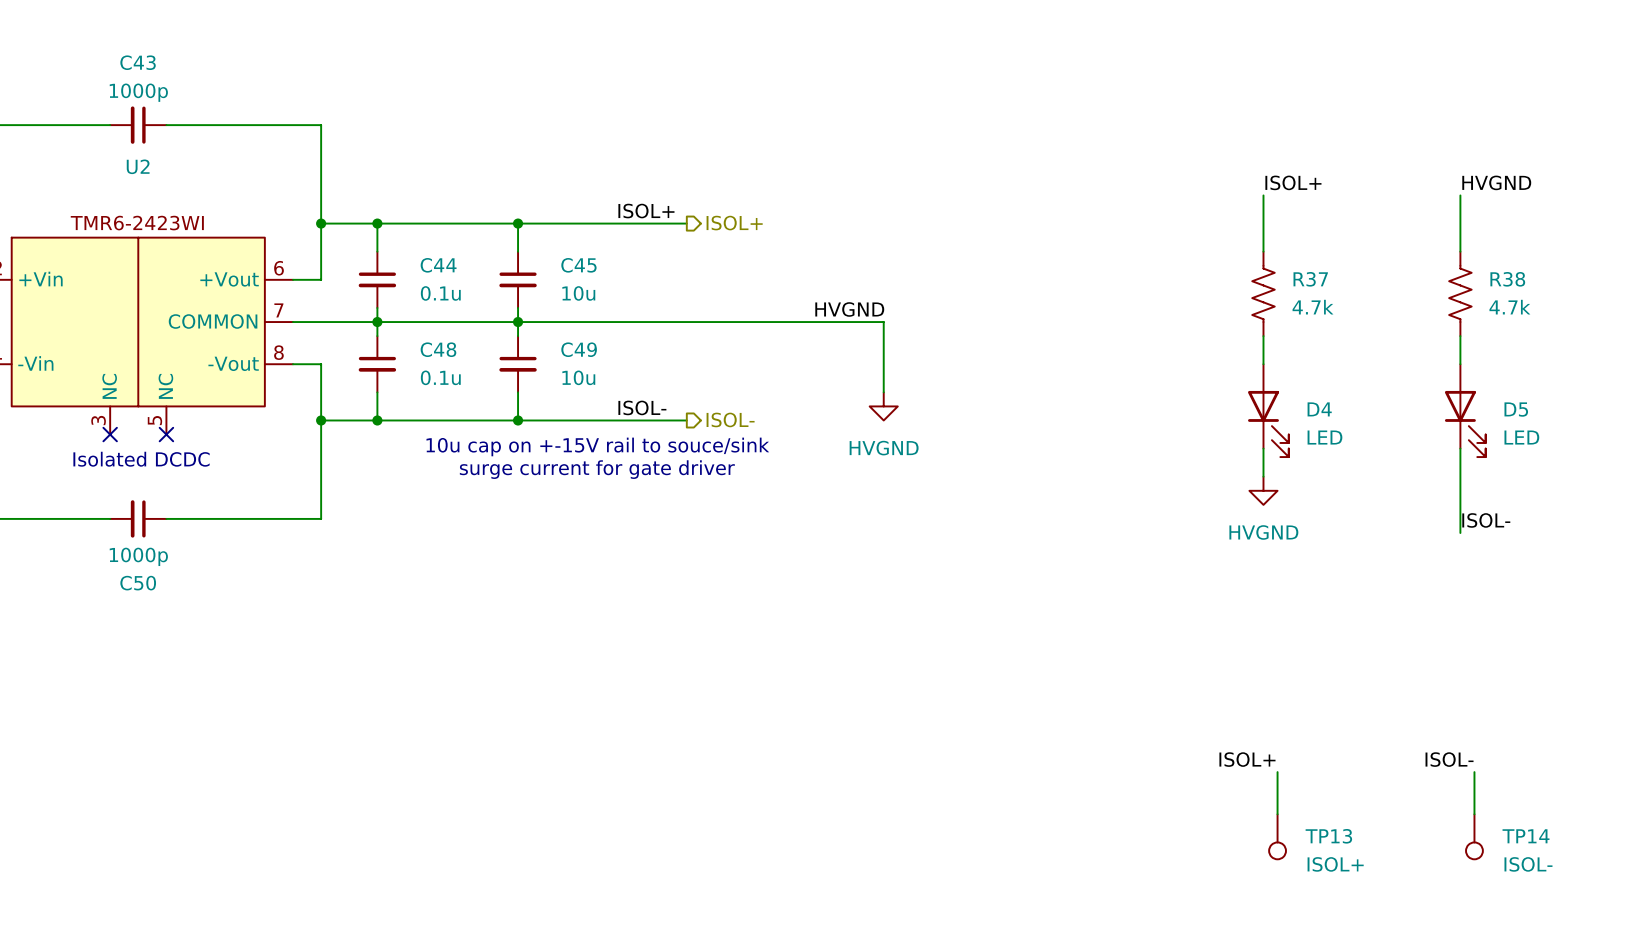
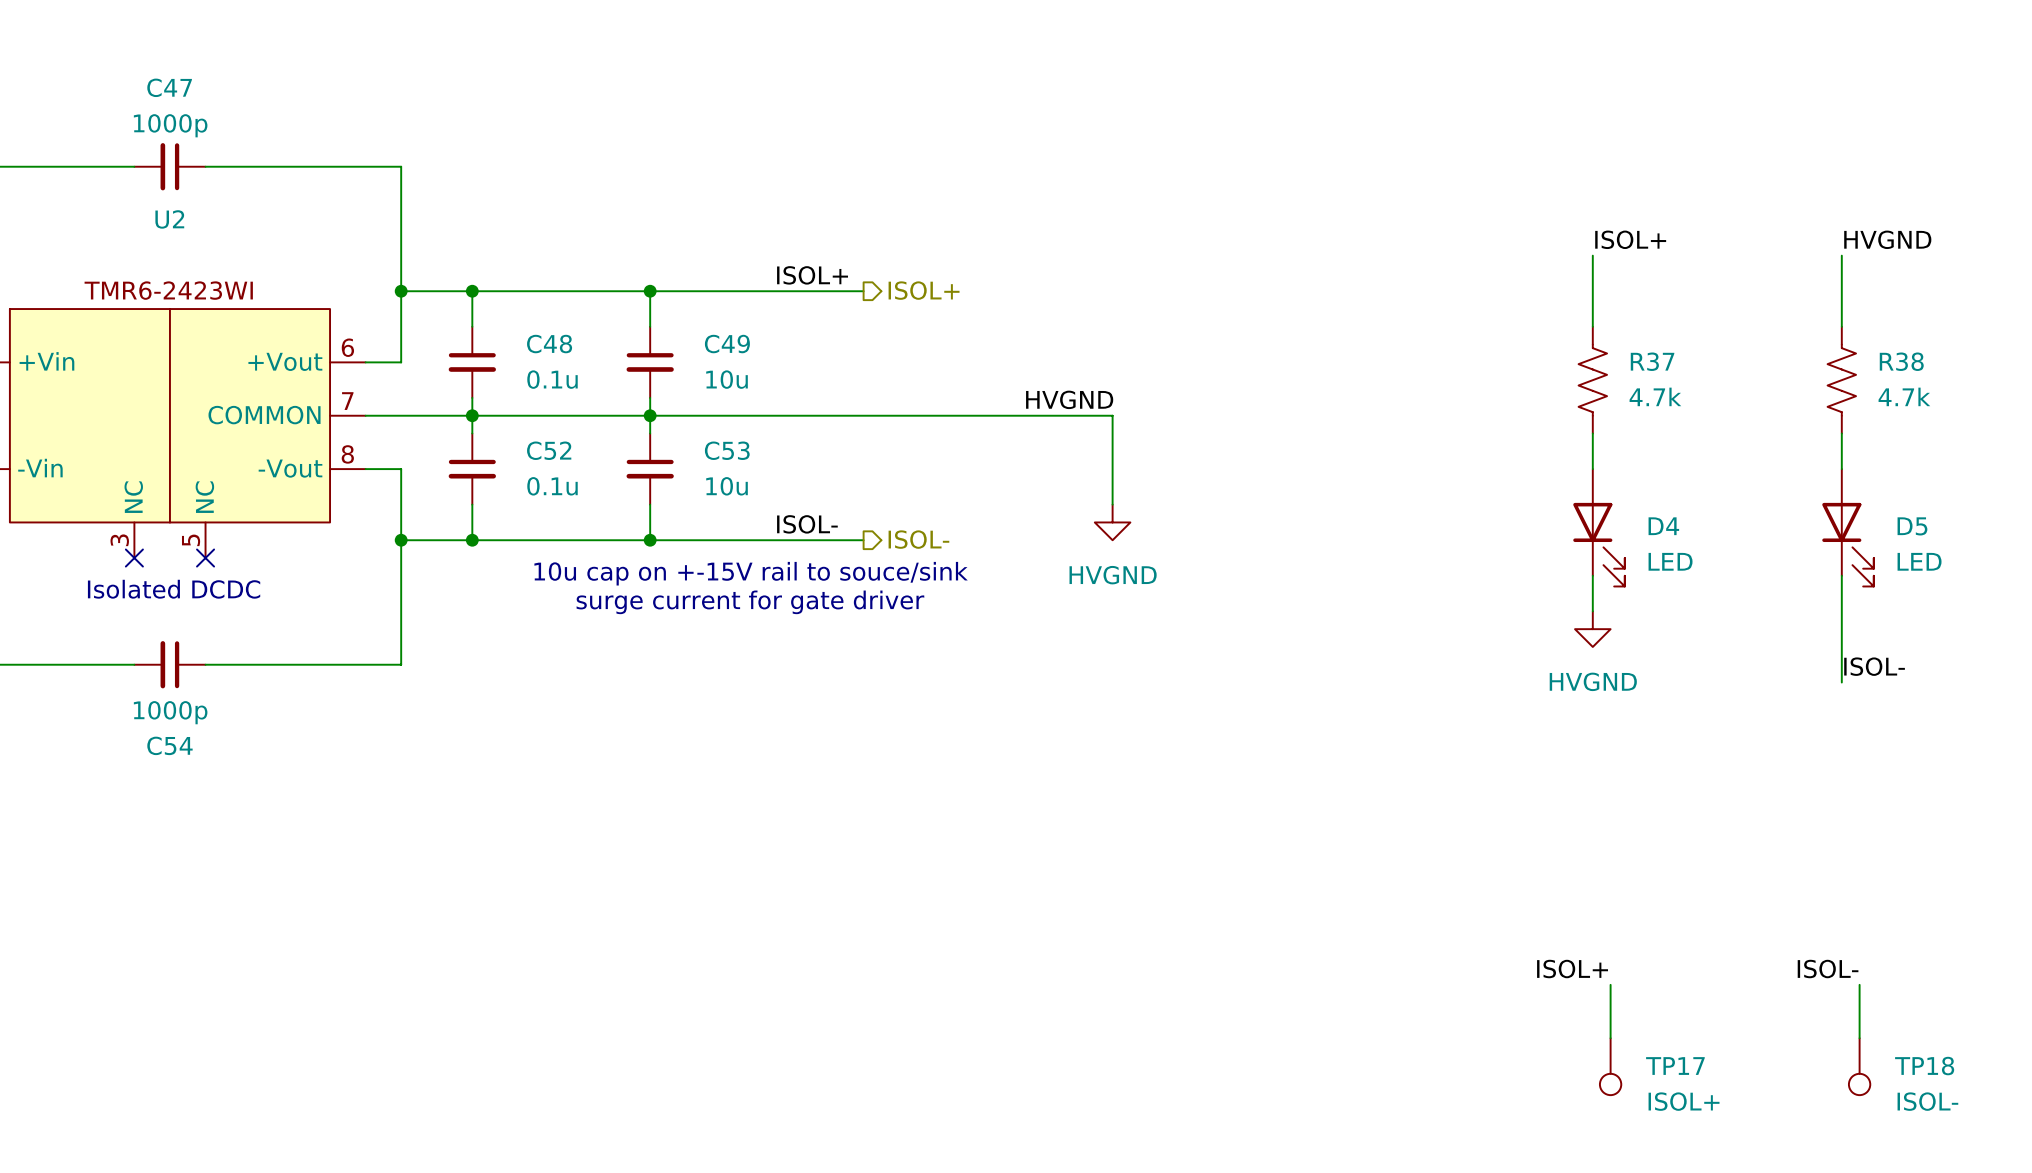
C43 name: C43 (138, 62) -> C47 (169, 87)
C44 name: C44 (438, 265) -> C48 (549, 344)
C45 name: C45 (578, 265) -> C49 (727, 344)
C48 name: C48 (438, 349) -> C52 (549, 450)
C49 name: C49 (579, 349) -> C53 (727, 450)
C50 name: C50 (138, 583) -> C54 (169, 745)
TP13 name: TP13 (1328, 836) -> TP17 (1675, 1066)
TP14 name: TP14 (1526, 836) -> TP18 (1924, 1066)

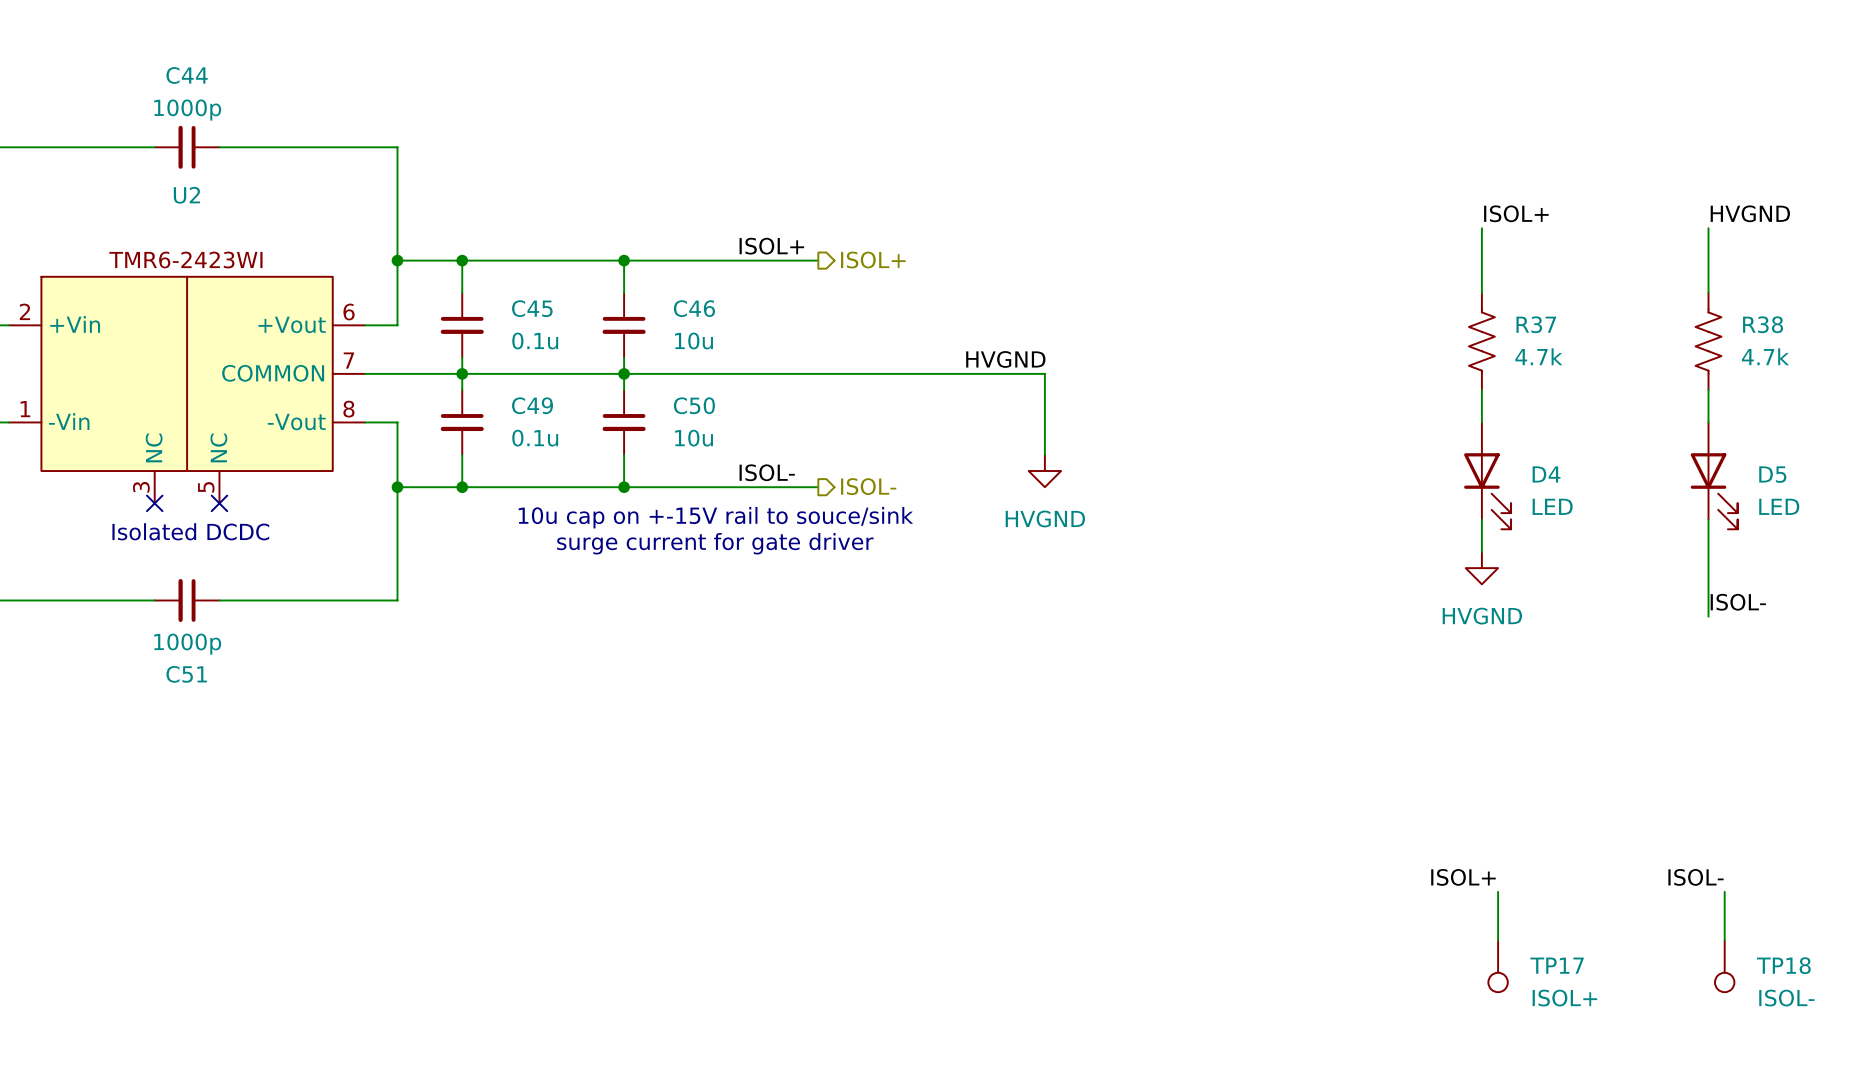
C47 name: C47 (169, 87) -> C44 (187, 75)
C48 name: C48 (549, 344) -> C45 (532, 308)
C49 name: C49 (727, 344) -> C46 (694, 308)
C52 name: C52 (549, 450) -> C49 (532, 405)
C53 name: C53 (727, 450) -> C50 (694, 405)
C54 name: C54 (169, 745) -> C51 (186, 674)

